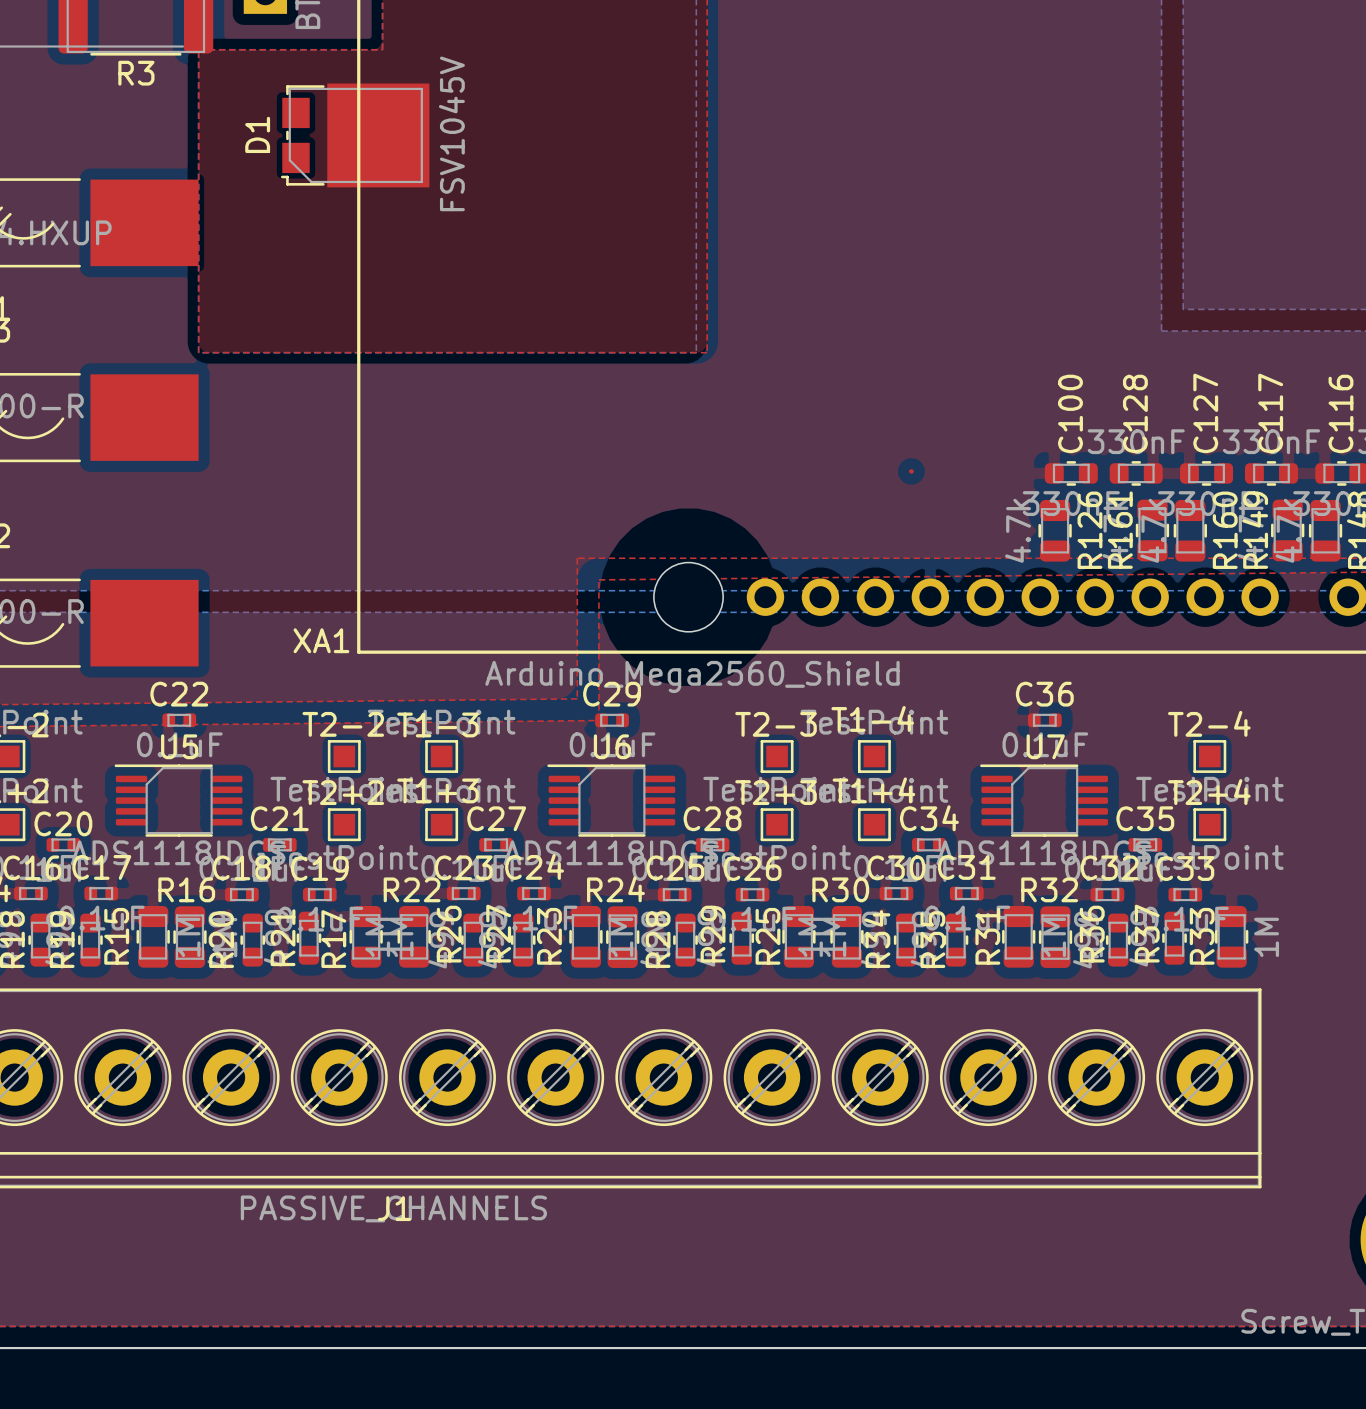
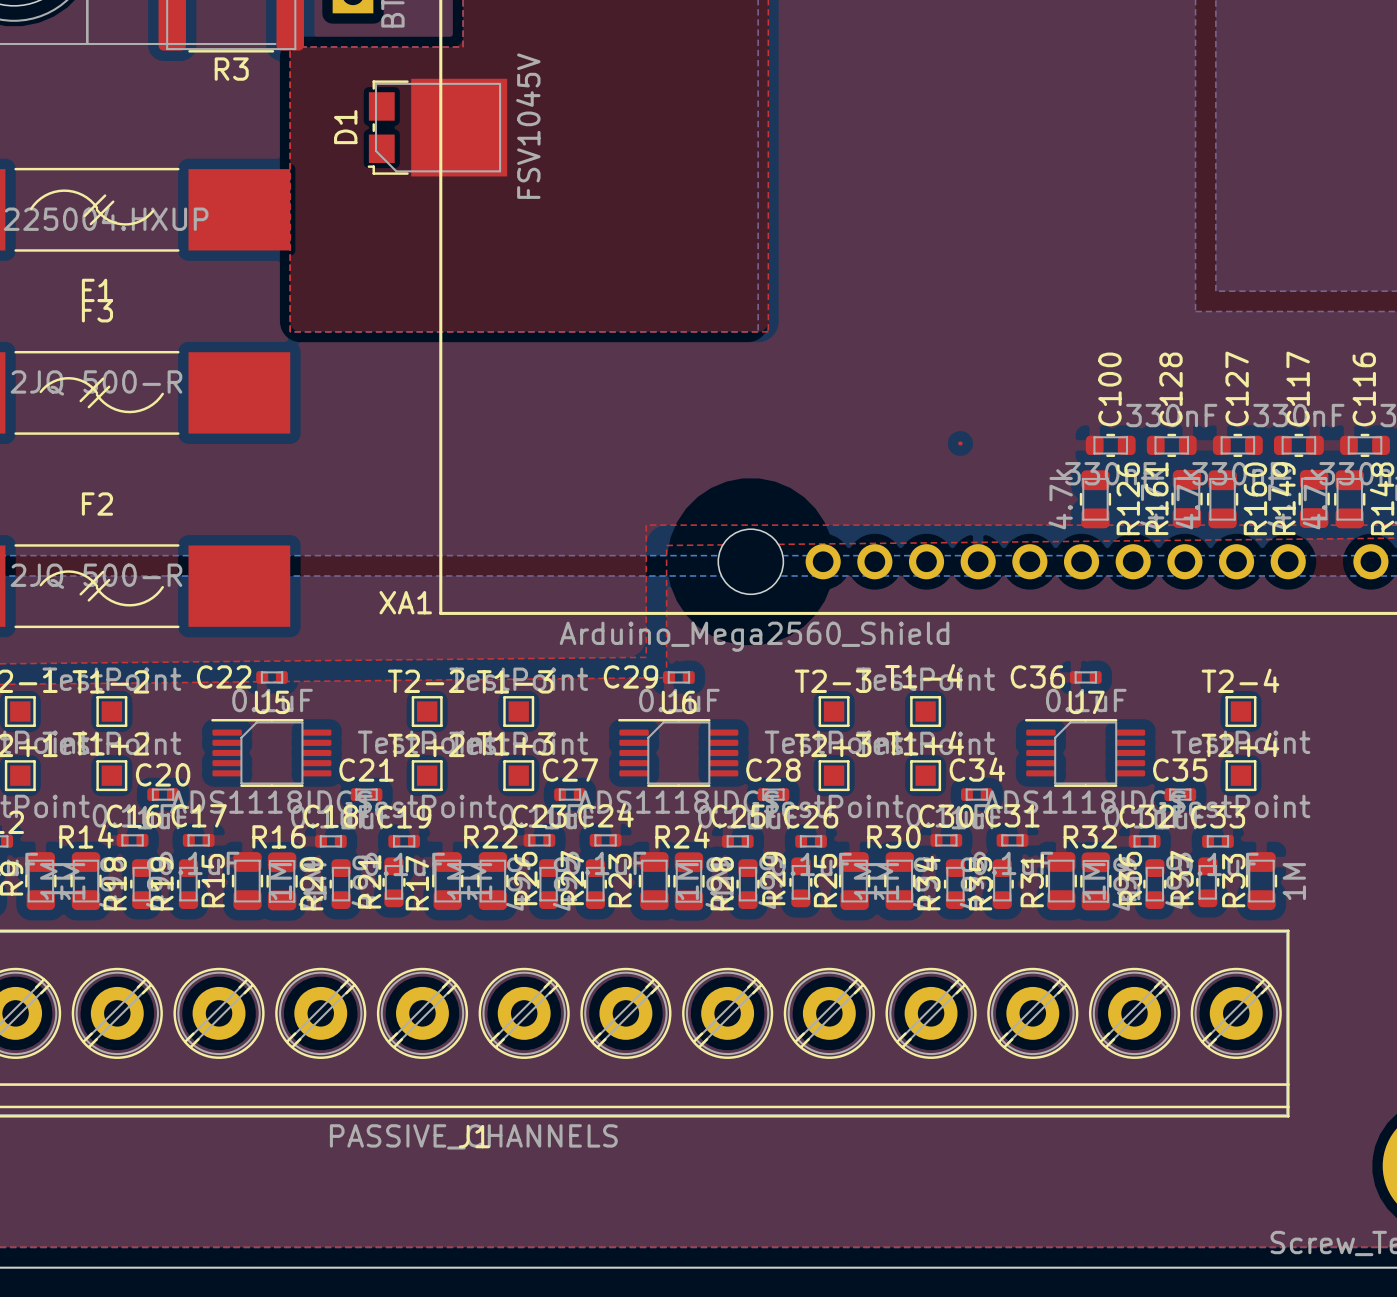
C22 name position: C22 (179, 694) -> C22 (224, 676)
C29 name position: C29 (612, 694) -> C29 (631, 676)
C36 name position: C36 (1044, 694) -> C36 (1037, 676)

